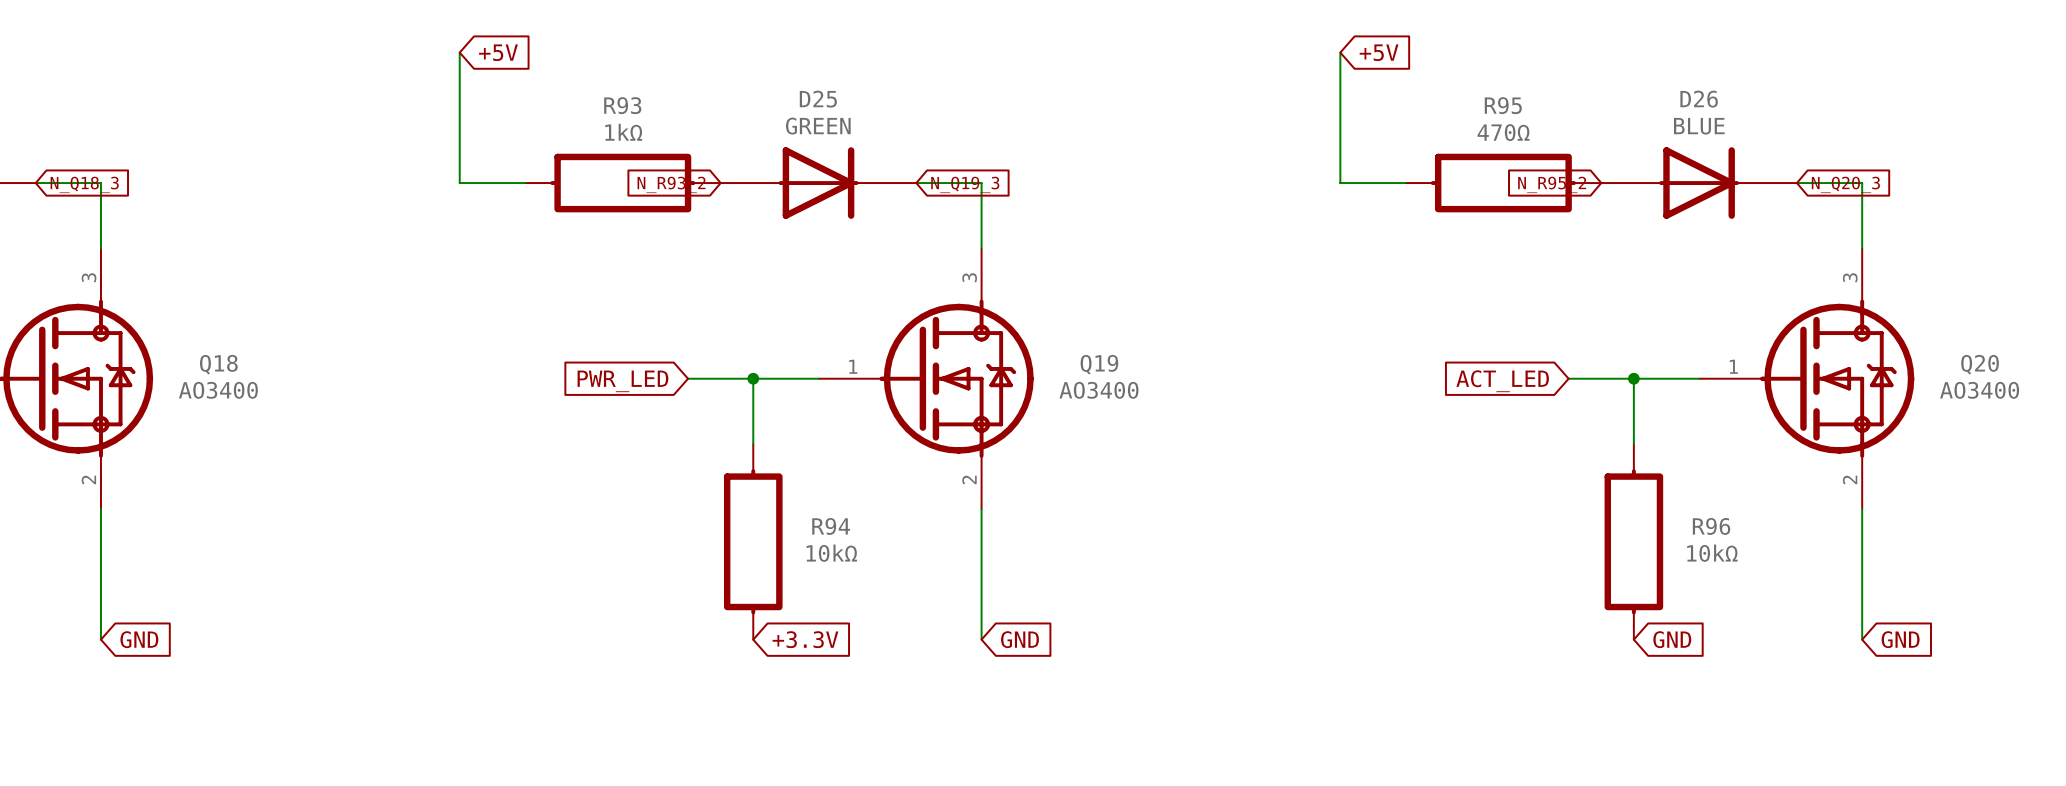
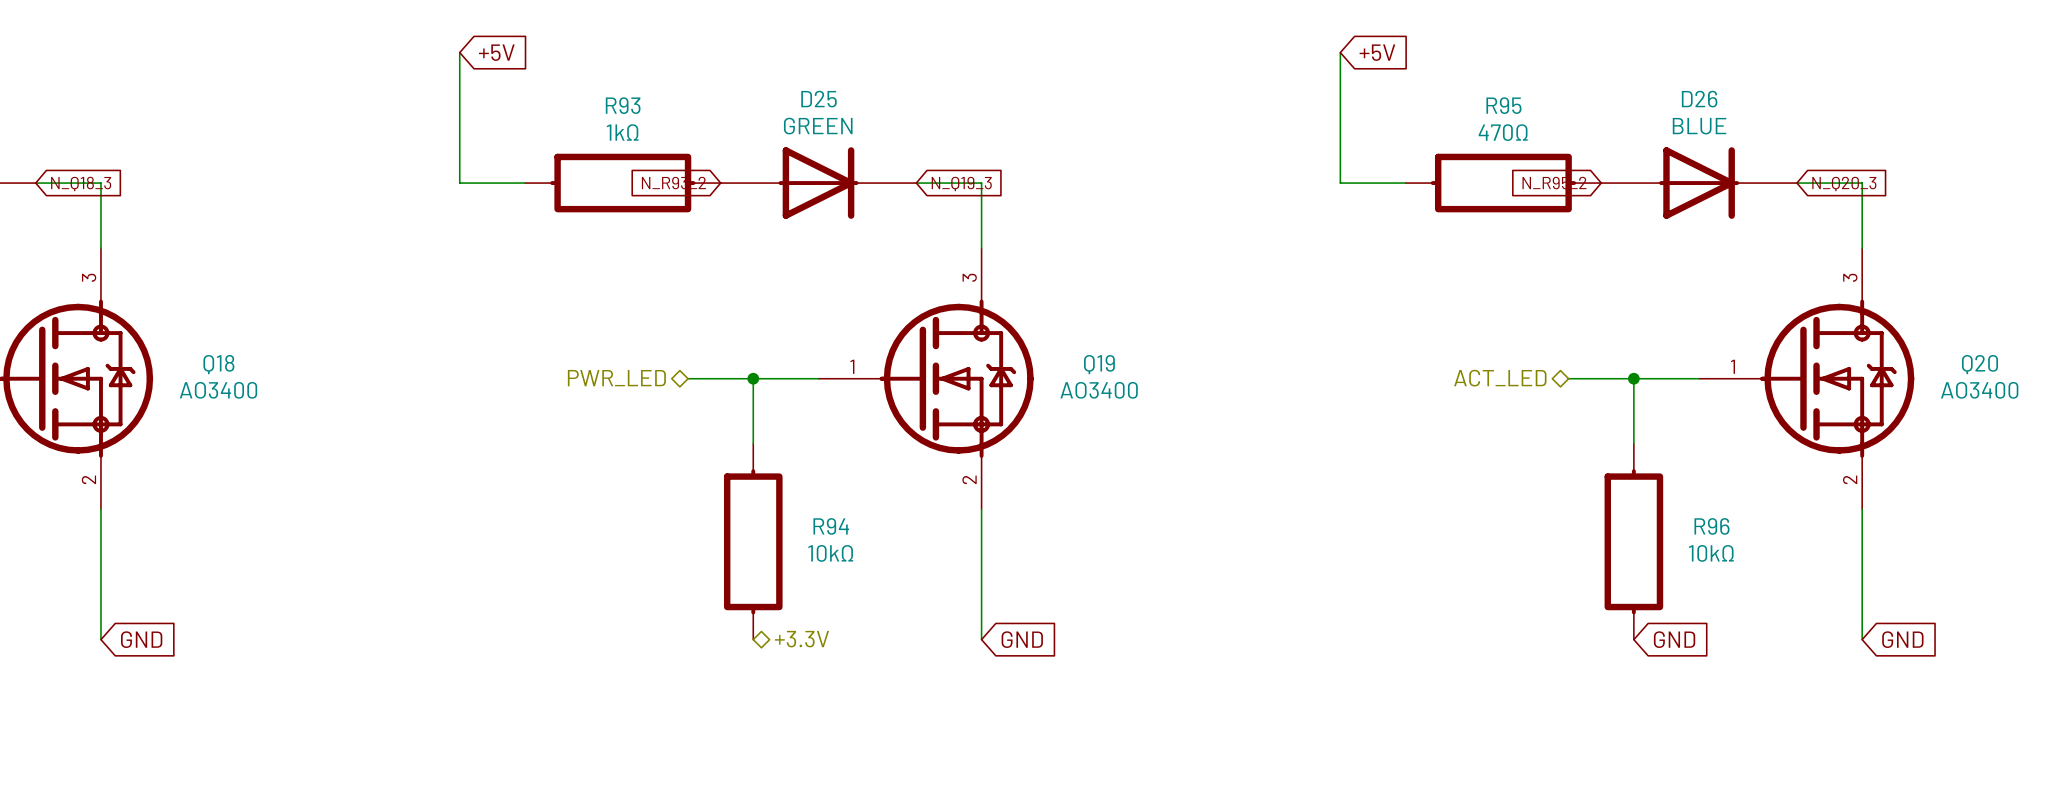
hierarchical label: none -> PWR_LED (616, 378)
hierarchical label: none -> ACT_LED (1500, 378)
global label: PWR_LED (622, 381) -> none
global label: ACT_LED (1502, 381) -> none
global label: +3.3V (805, 639) -> none
hierarchical label: none -> +3.3V (801, 639)

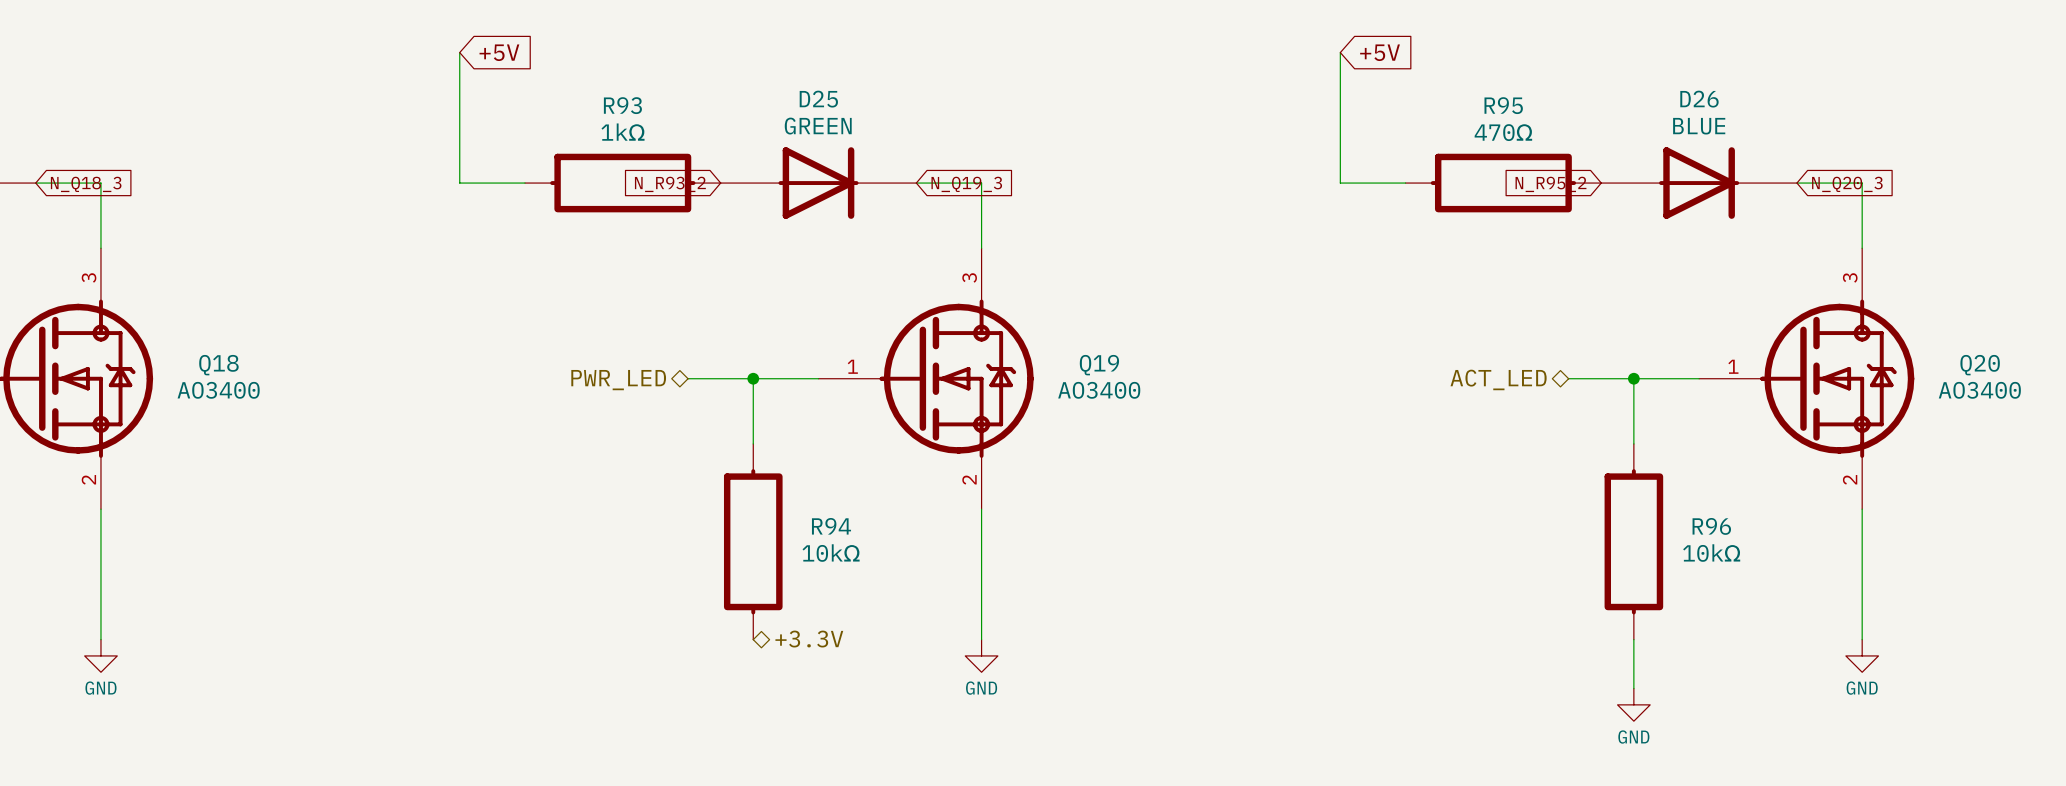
global label: GND (141, 639) -> none
global label: GND (1022, 639) -> none
wire: none -> (1633, 639) (1633, 688)
global label: GND (1674, 639) -> none
global label: GND (1902, 639) -> none
power symbol: none -> GND (100, 655)
power symbol: none -> GND (981, 655)
power symbol: none -> GND (1862, 655)
power symbol: none -> GND (1633, 704)

